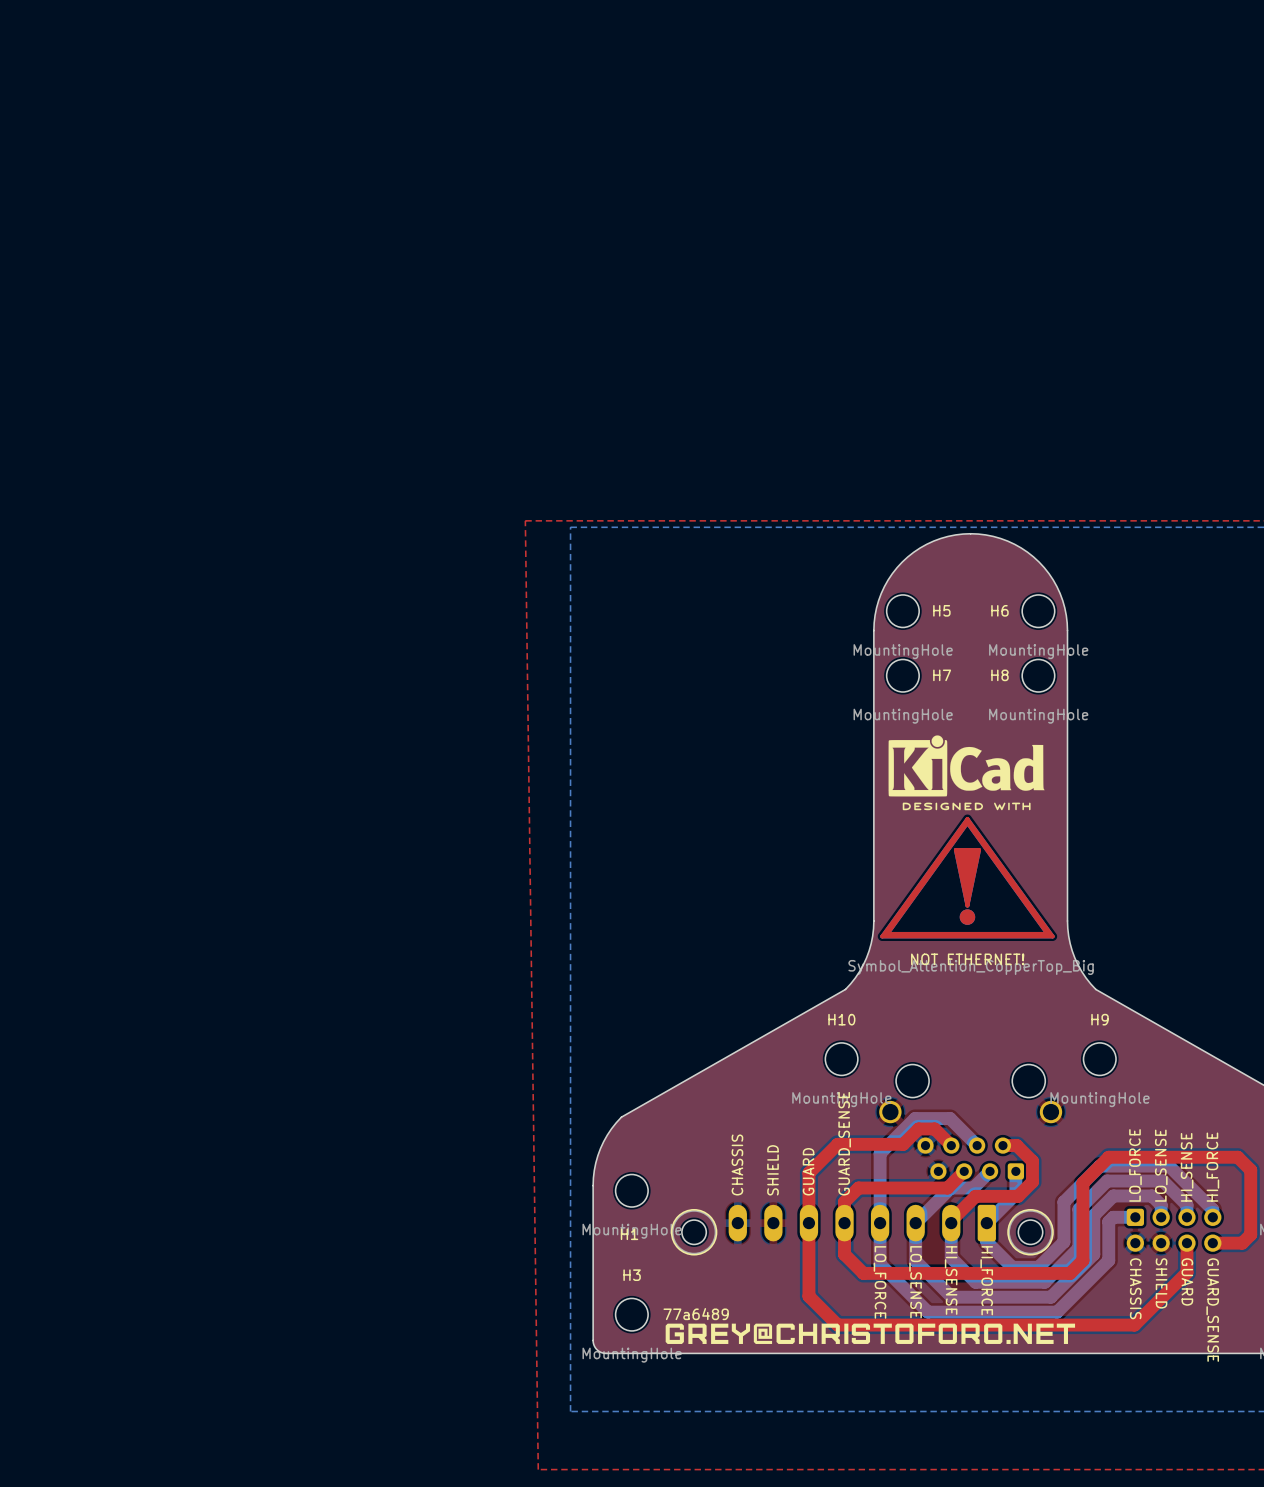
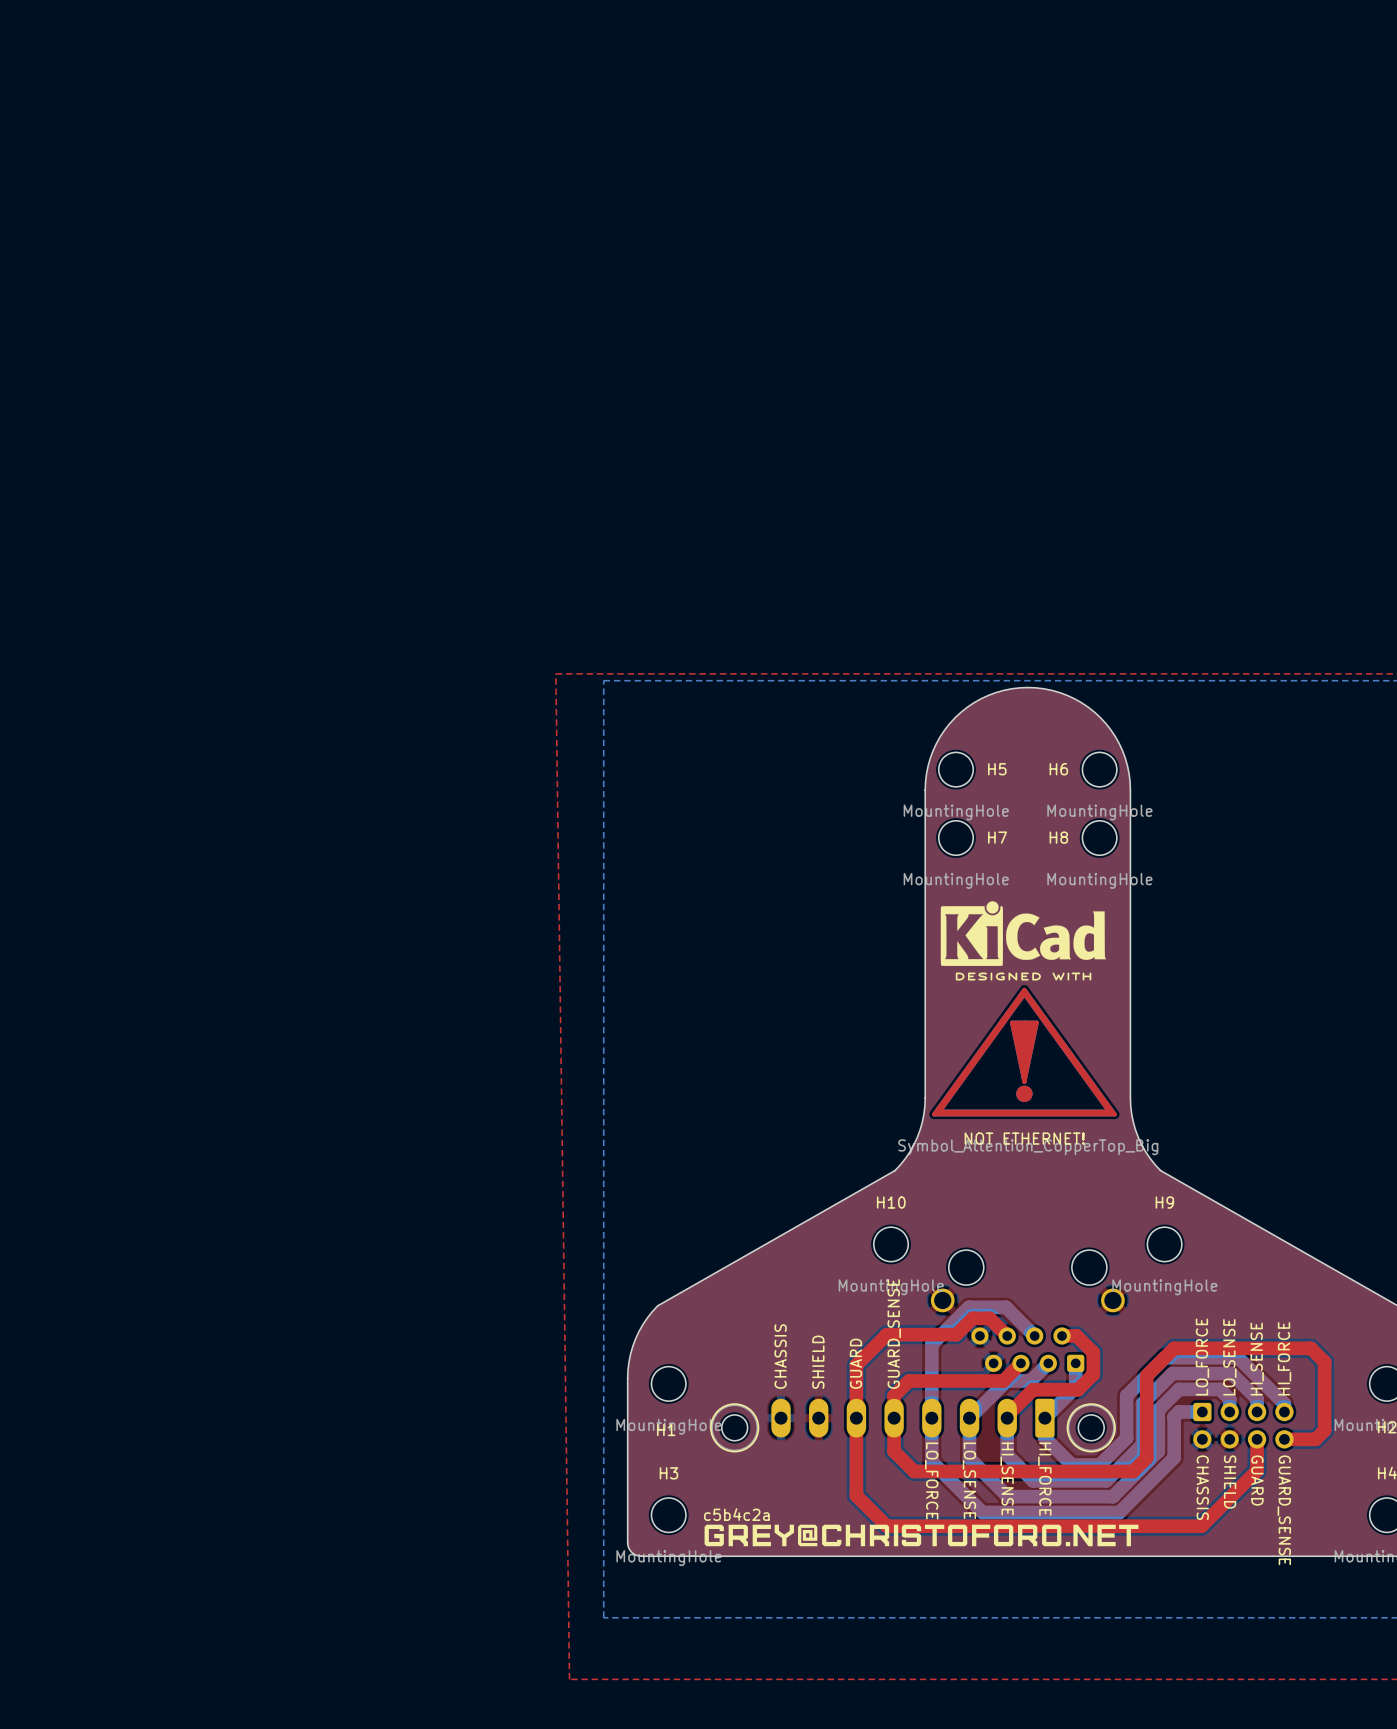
text: 77a6489 (696, 1314) -> c5b4c2a (736, 1514)

